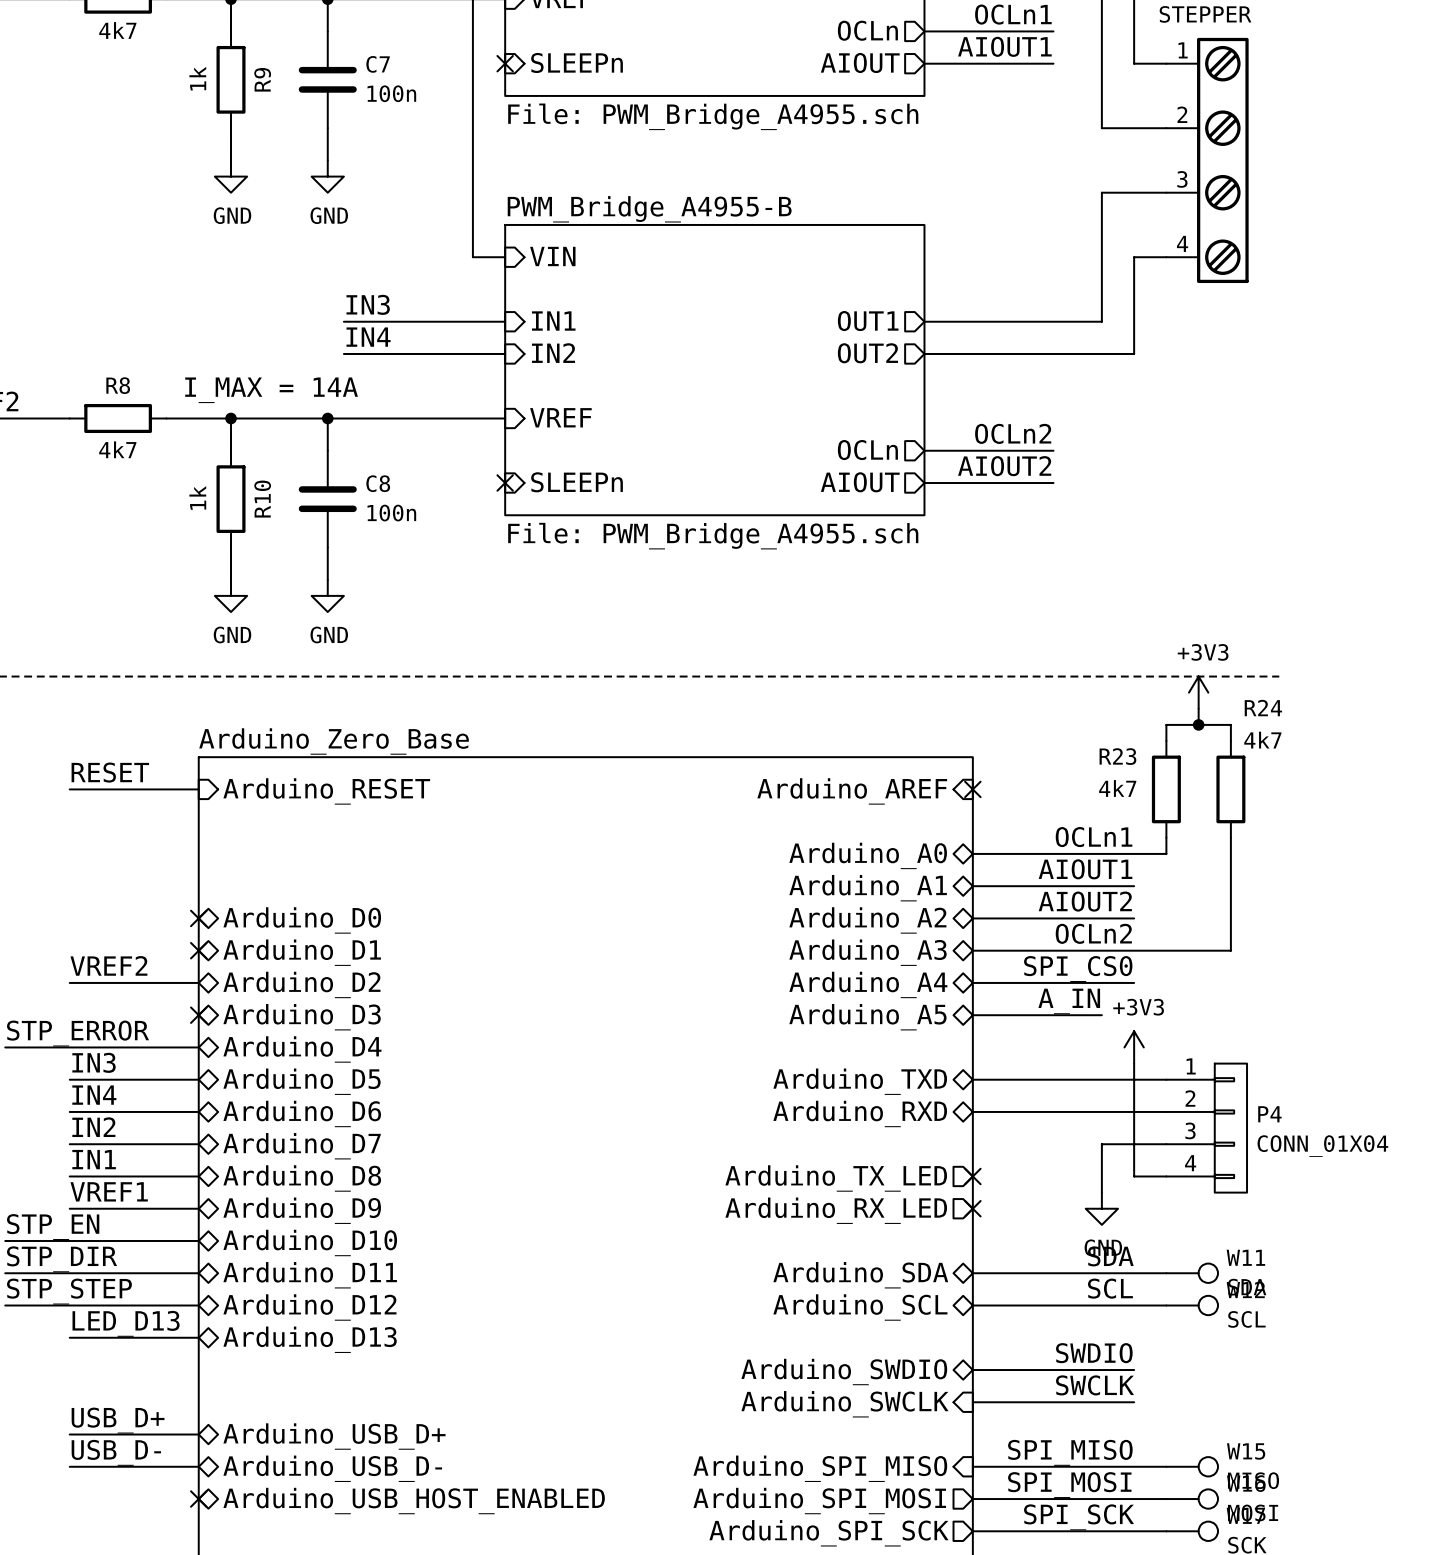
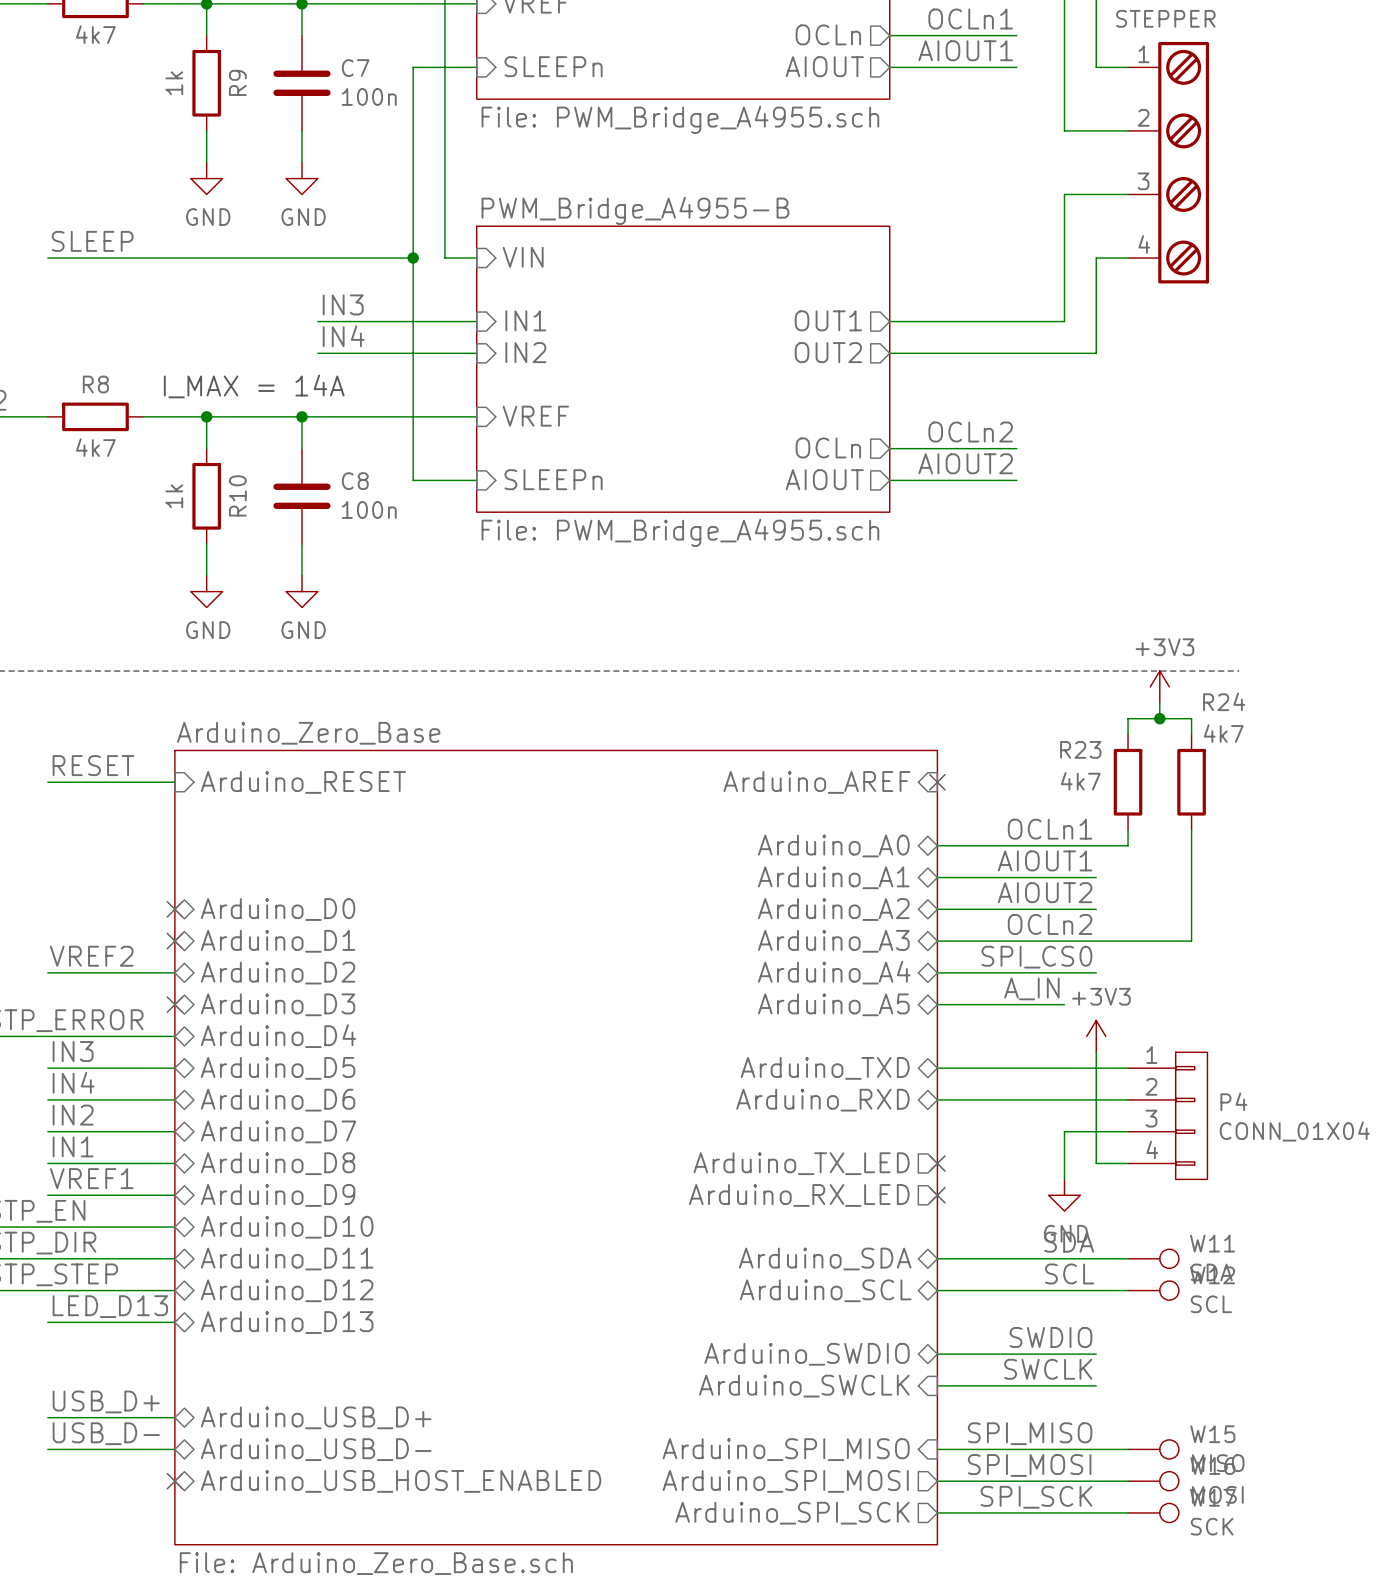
wire: none -> (476, 67) (413, 67) (413, 480) (476, 480)
no-connect mark: (505, 63) -> none
label: none -> SLEEP (92, 241)
wire: none -> (47, 258) (413, 258)
junction: none -> (413, 258)
no-connect mark: (505, 483) -> none

